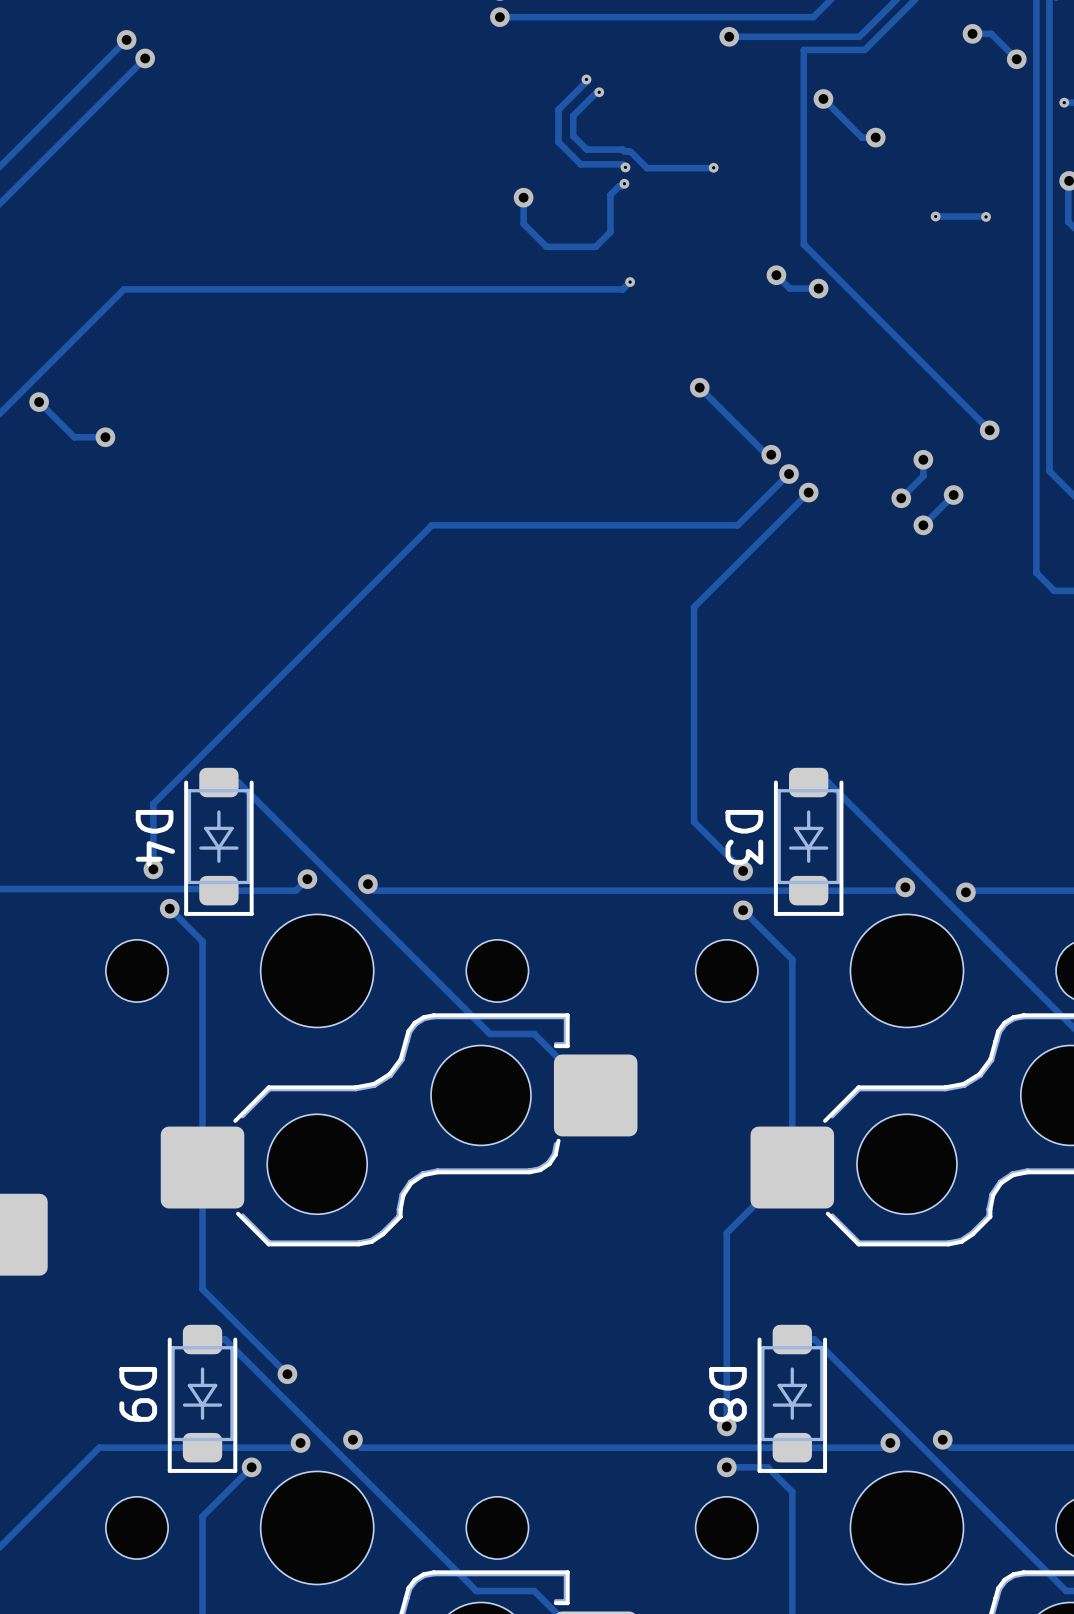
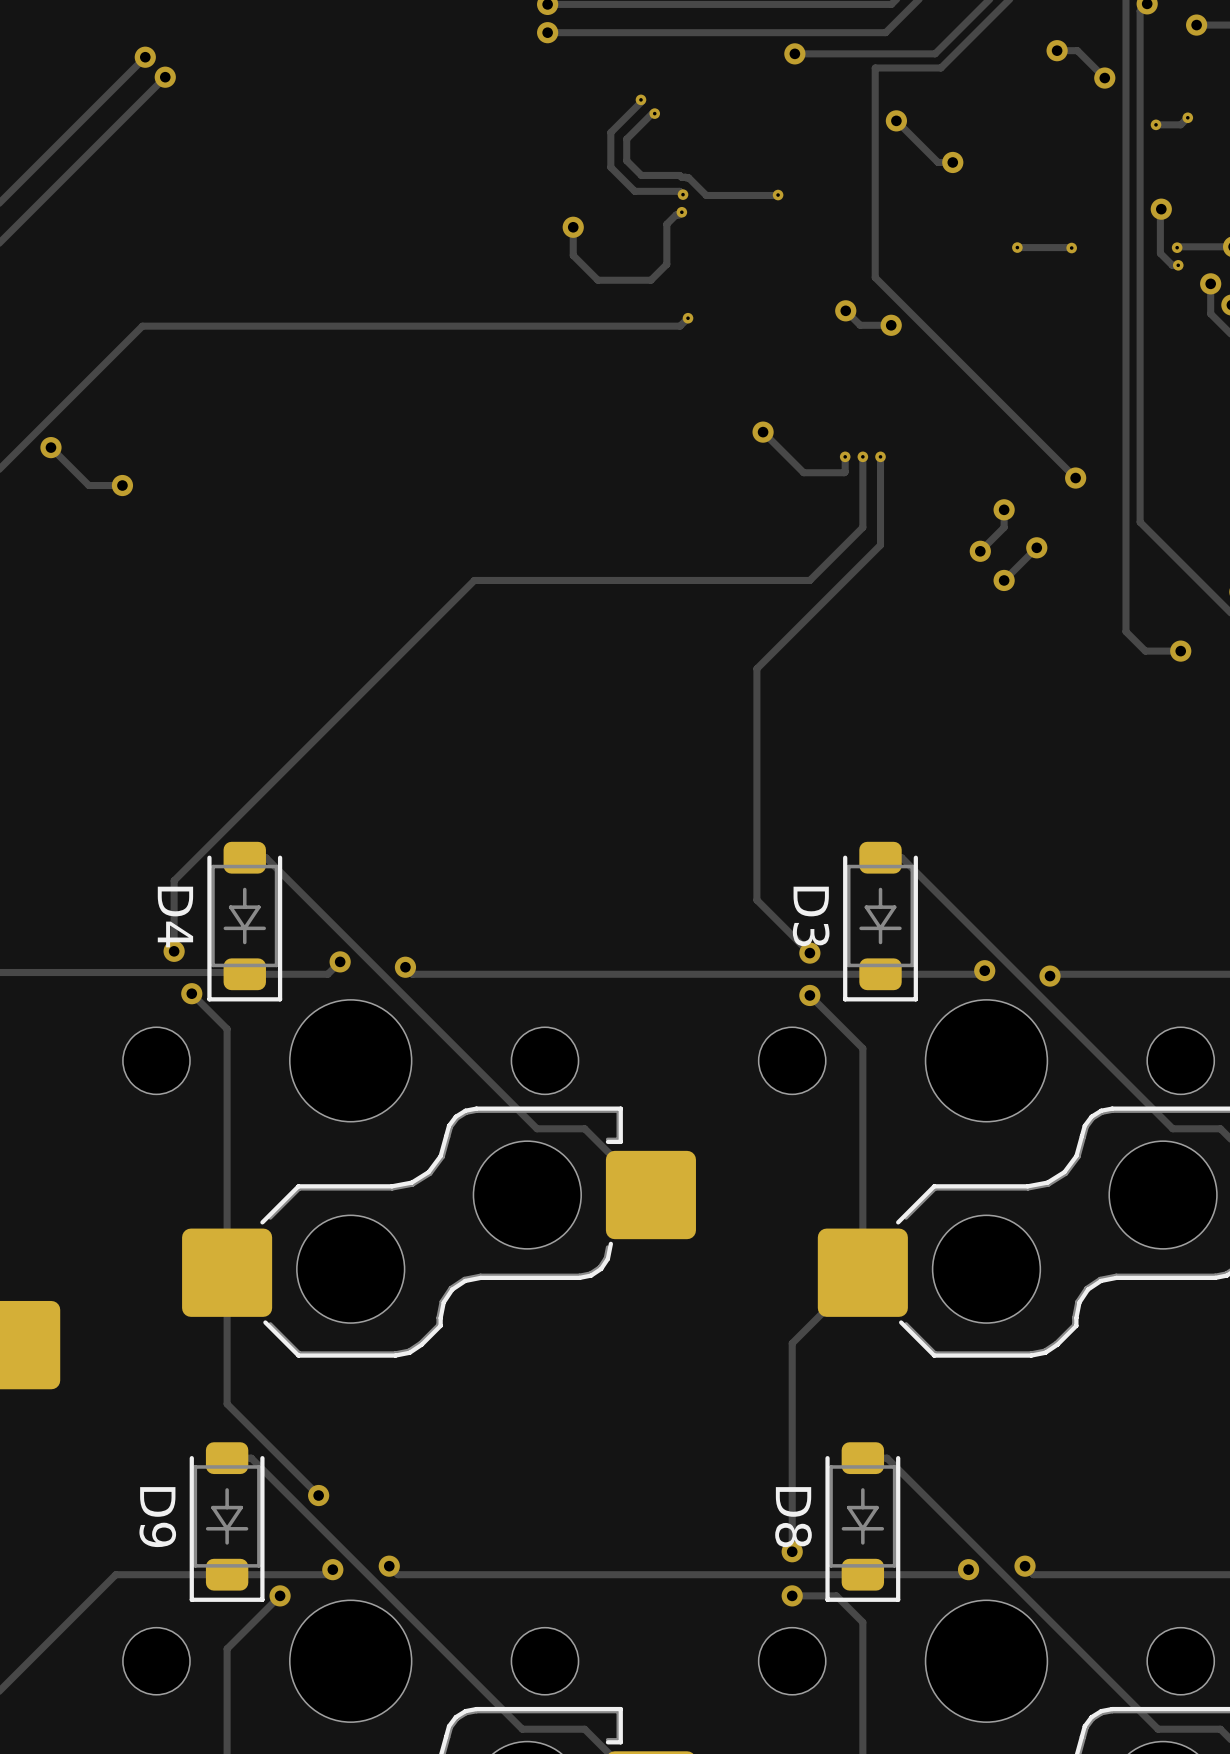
via: none -> (845, 456)
via: none -> (862, 456)
track: none -> (880, 456) (880, 545)
via: none -> (880, 456)
track: (737, 425) (766, 454) (771, 454) -> (803, 472) (844, 472) (845, 456)
via: (771, 454) -> none
track: (789, 474) (737, 525) -> (862, 456) (862, 527) (809, 580) (804, 580)
via: (789, 474) -> none
via: (808, 492) -> none

